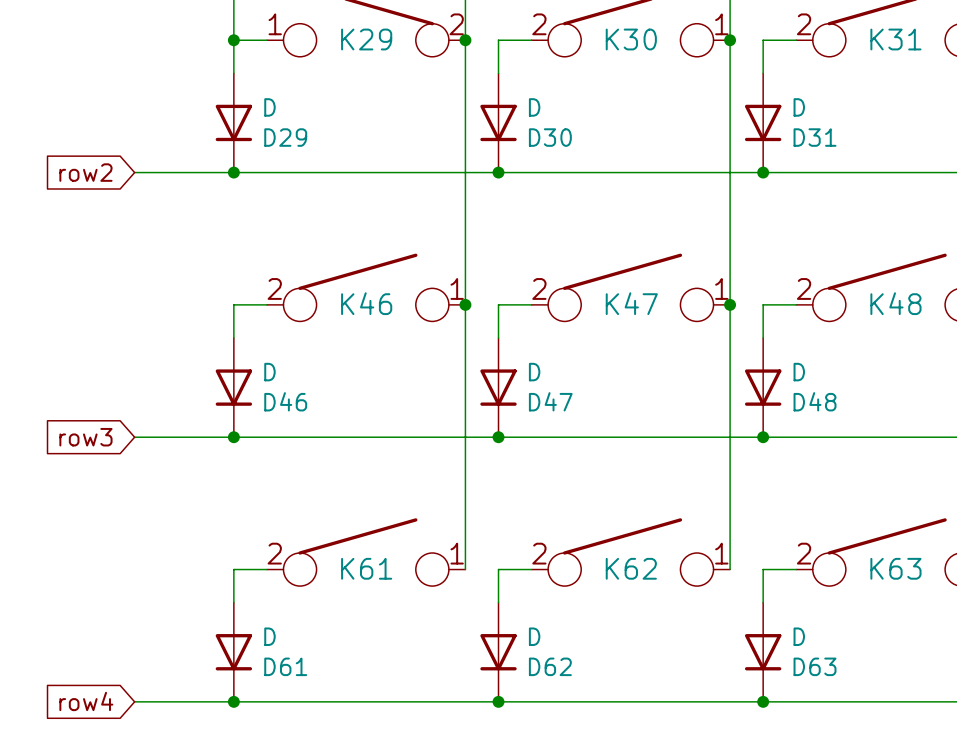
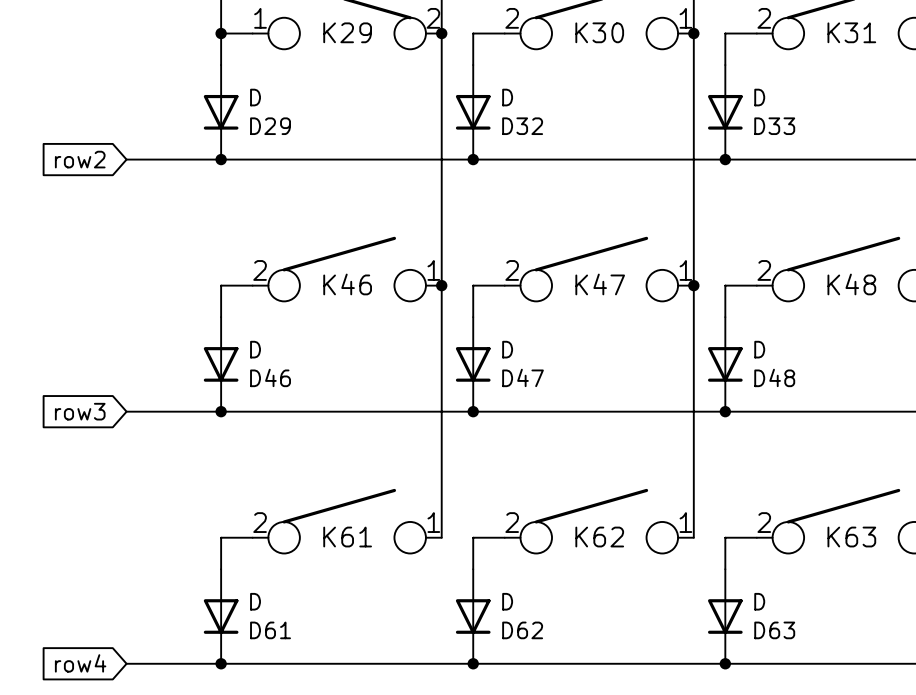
D30 name: D30 (550, 137) -> D32 (522, 126)
D31 name: D31 (815, 137) -> D33 (774, 126)

